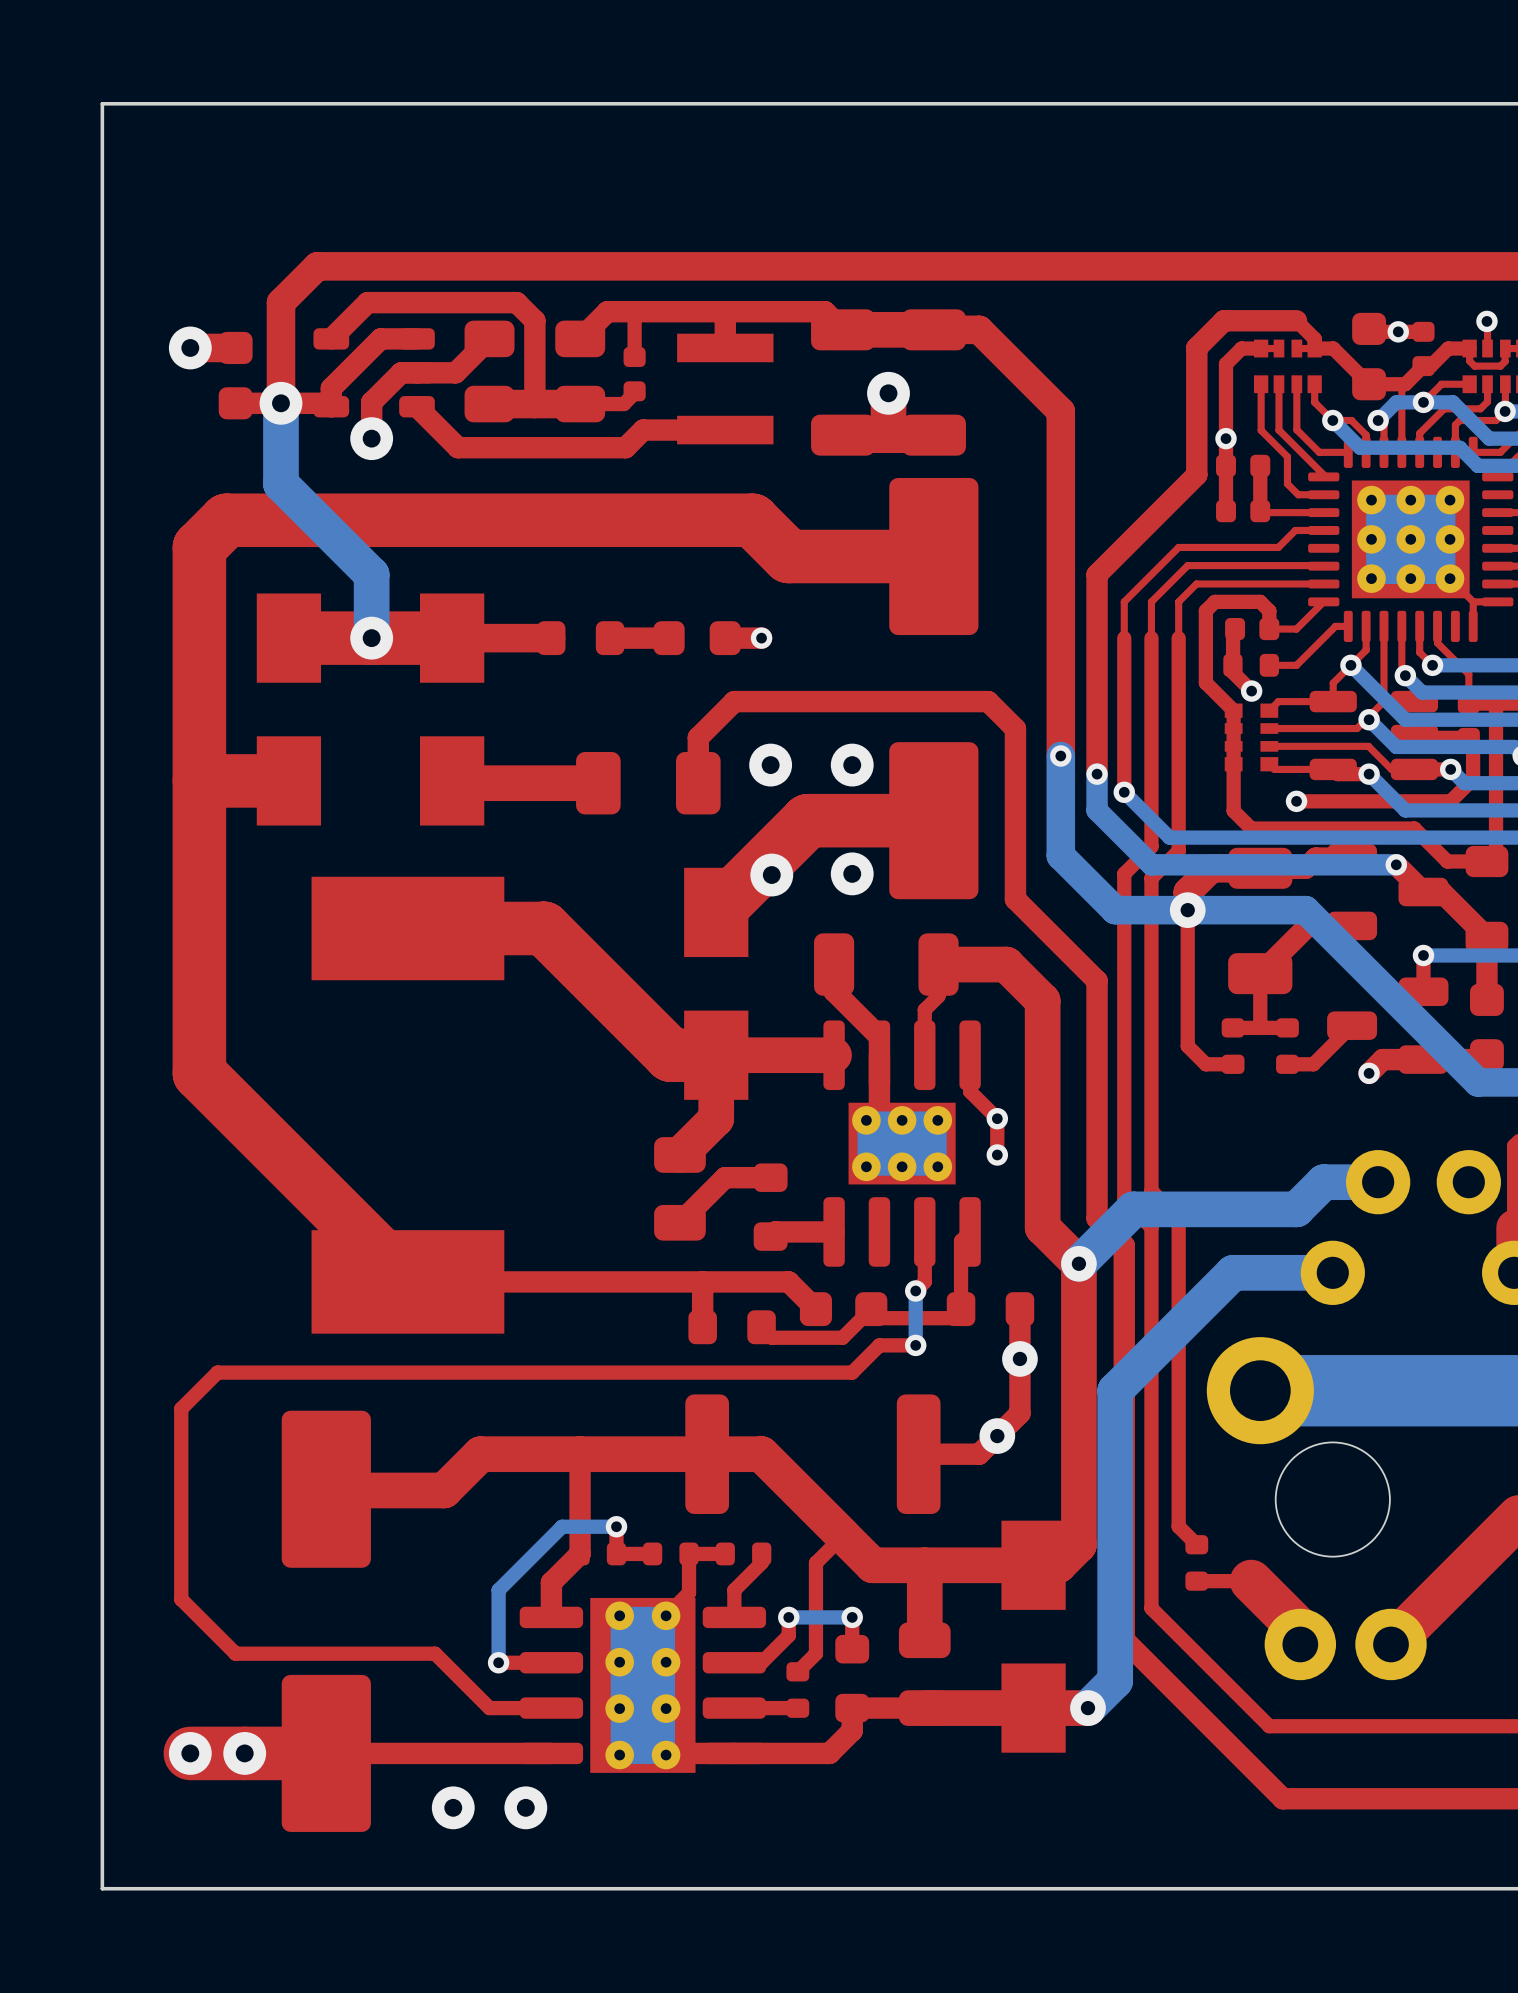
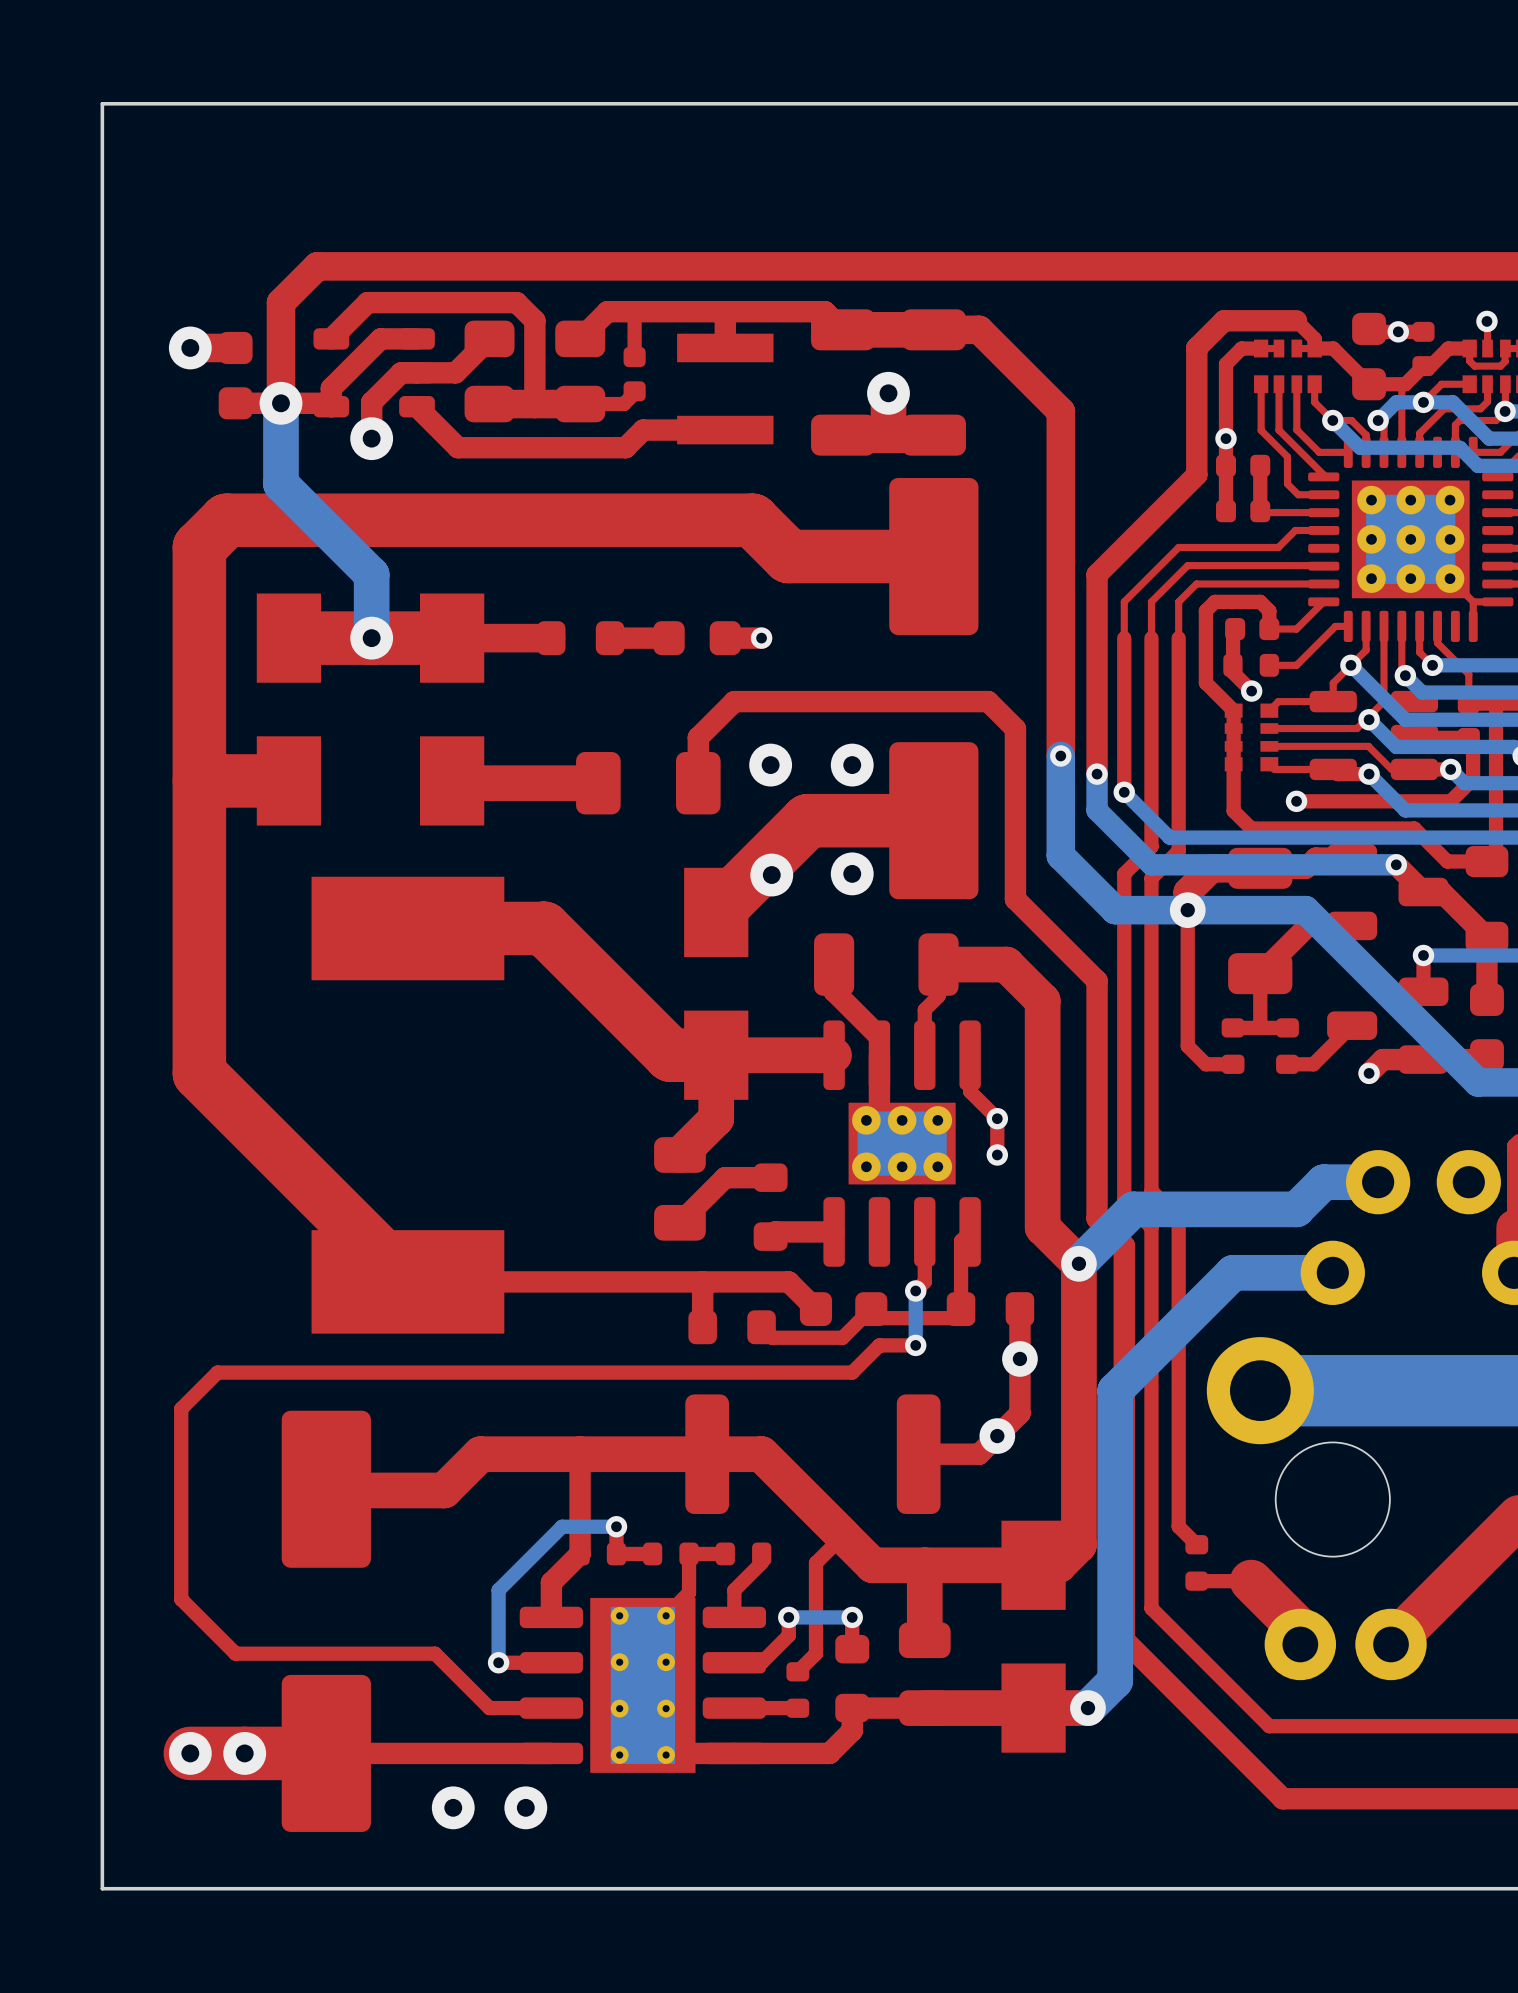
part footprint: [519, 1597, 767, 1773] -> [519, 1597, 767, 1773]

